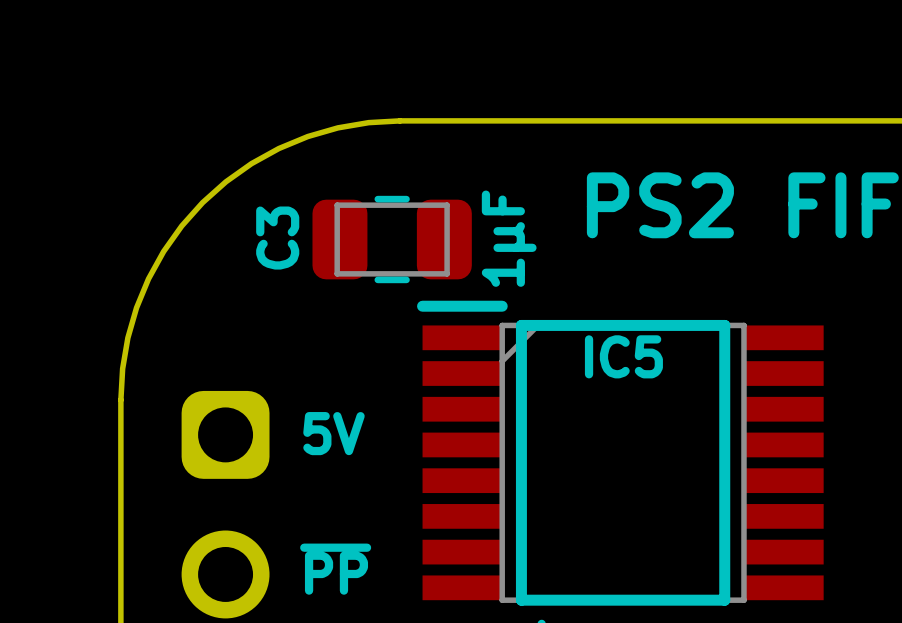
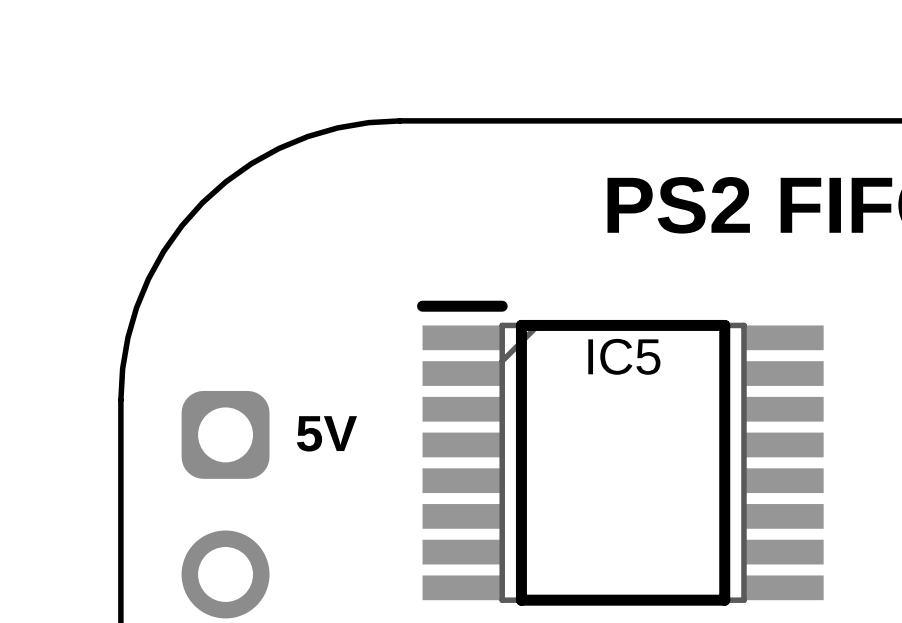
C3: 1μF (392, 239) -> none
text: ~{PP} (335, 569) -> none

